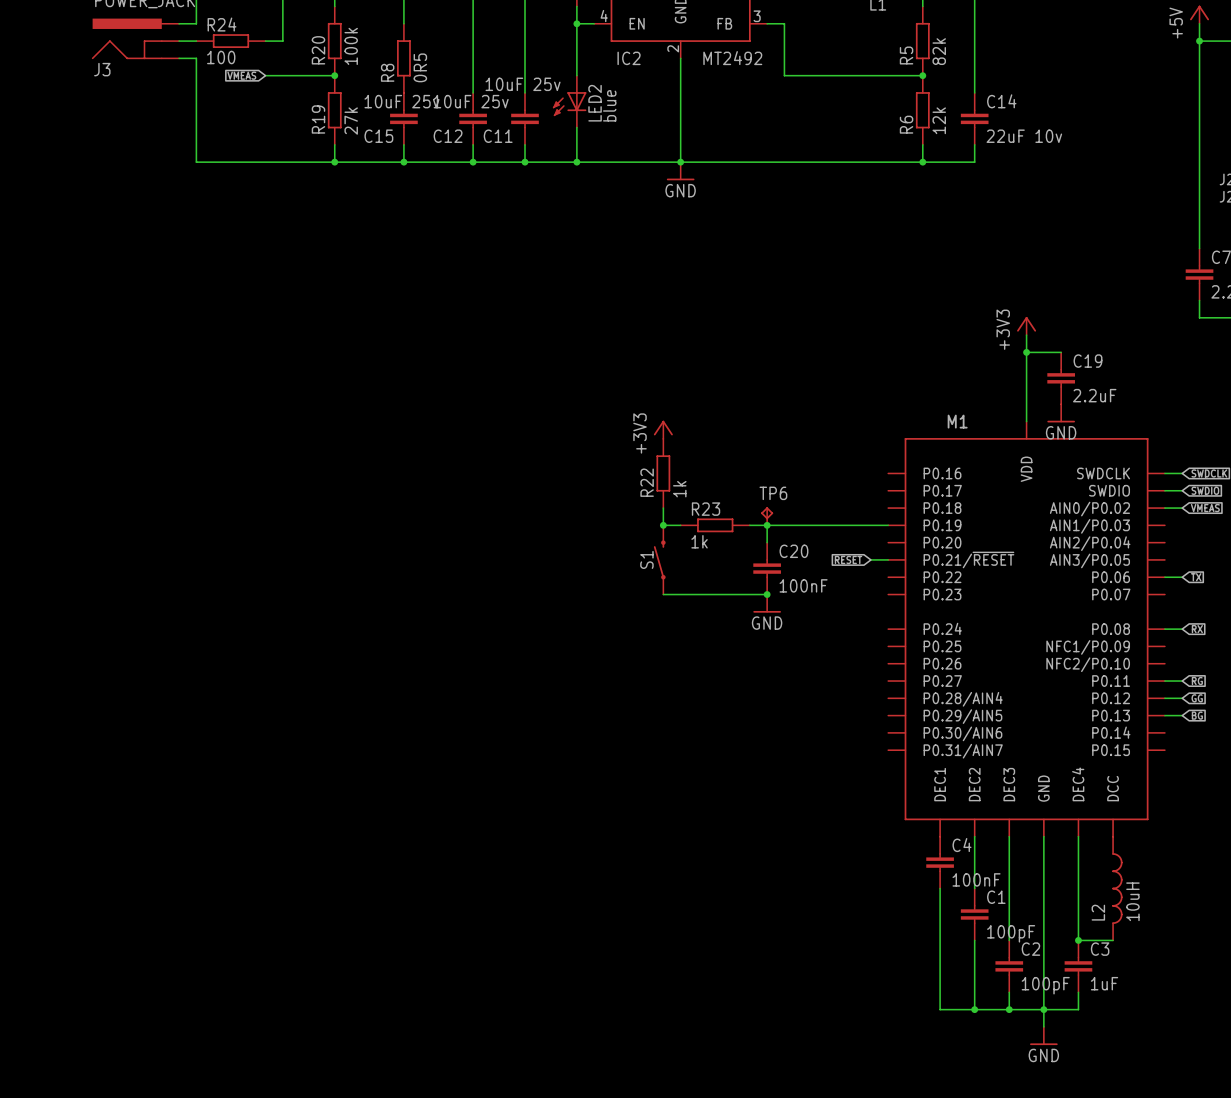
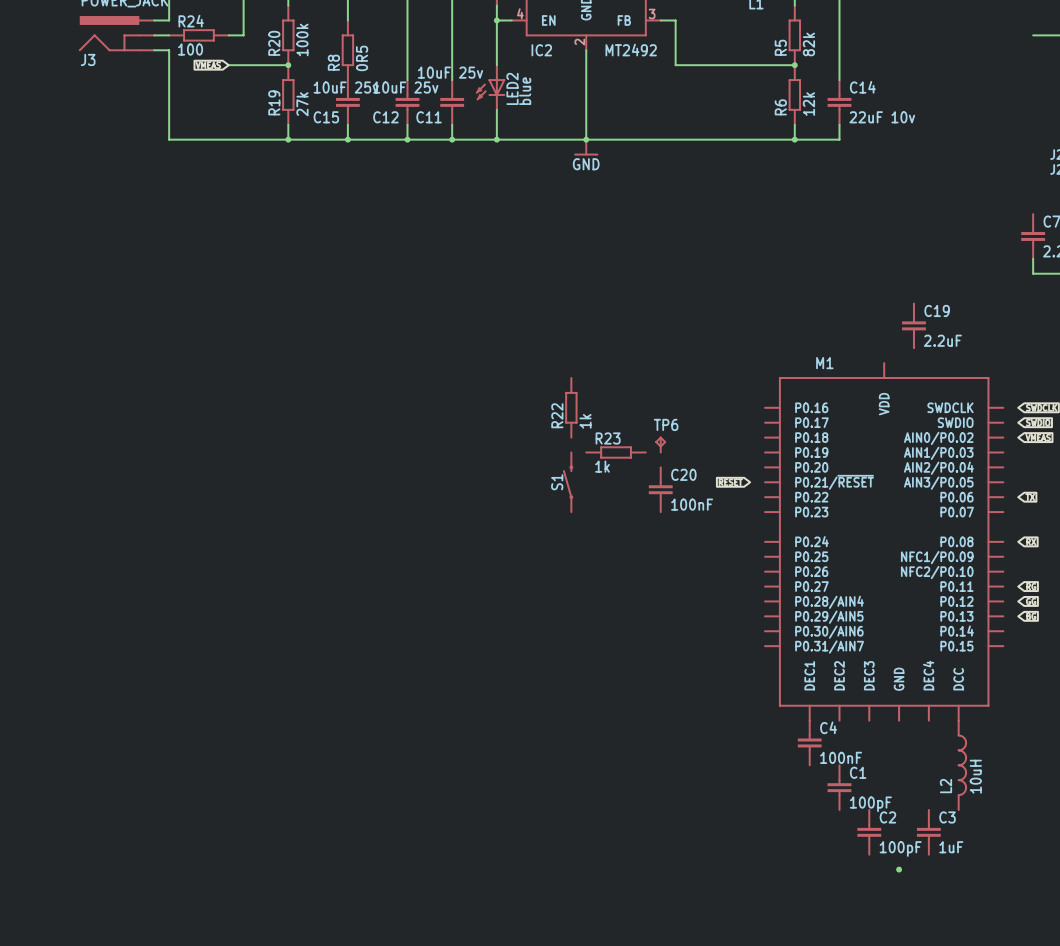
power symbol: +5V (1199, 14) -> none
wire: (1199, 23) (1199, 248) -> none
junction: (1199, 41) -> none
power symbol: +3V3 (1026, 326) -> none
wire: (1026, 335) (1026, 421) -> none
wire: (1026, 352) (1061, 352) -> none
junction: (1026, 352) -> none
power symbol: GND (1061, 413) -> none
power symbol: +3V3 (663, 429) -> none
wire: (1164, 473) (1182, 473) -> none
wire: (1164, 490) (1182, 490) -> none
wire: (663, 508) (663, 525) (680, 525) -> none
wire: (1164, 508) (1182, 508) -> none
junction: (663, 525) -> none
wire: (749, 525) (888, 525) -> none
wire: (767, 525) (767, 542) -> none
junction: (767, 525) -> none
wire: (870, 559) (888, 559) -> none
wire: (1164, 577) (1182, 577) -> none
wire: (663, 594) (767, 594) -> none
junction: (767, 594) -> none
power symbol: GND (767, 603) -> none
wire: (1164, 629) (1182, 629) -> none
wire: (1164, 681) (1182, 681) -> none
wire: (1164, 698) (1182, 698) -> none
wire: (1164, 715) (1182, 715) -> none
wire: (974, 836) (974, 888) -> none
wire: (1009, 836) (1009, 940) -> none
wire: (1043, 836) (1043, 1026) -> none
wire: (1078, 836) (1078, 940) (1113, 940) -> none
wire: (940, 888) (940, 1009) (1078, 1009) (1078, 992) -> none
wire: (974, 940) (974, 1009) -> none
junction: (1078, 940) -> none
wire: (1009, 992) (1009, 1009) -> none
junction: (974, 1009) -> none
junction: (1009, 1009) -> none
power symbol: GND (1043, 1036) -> none

